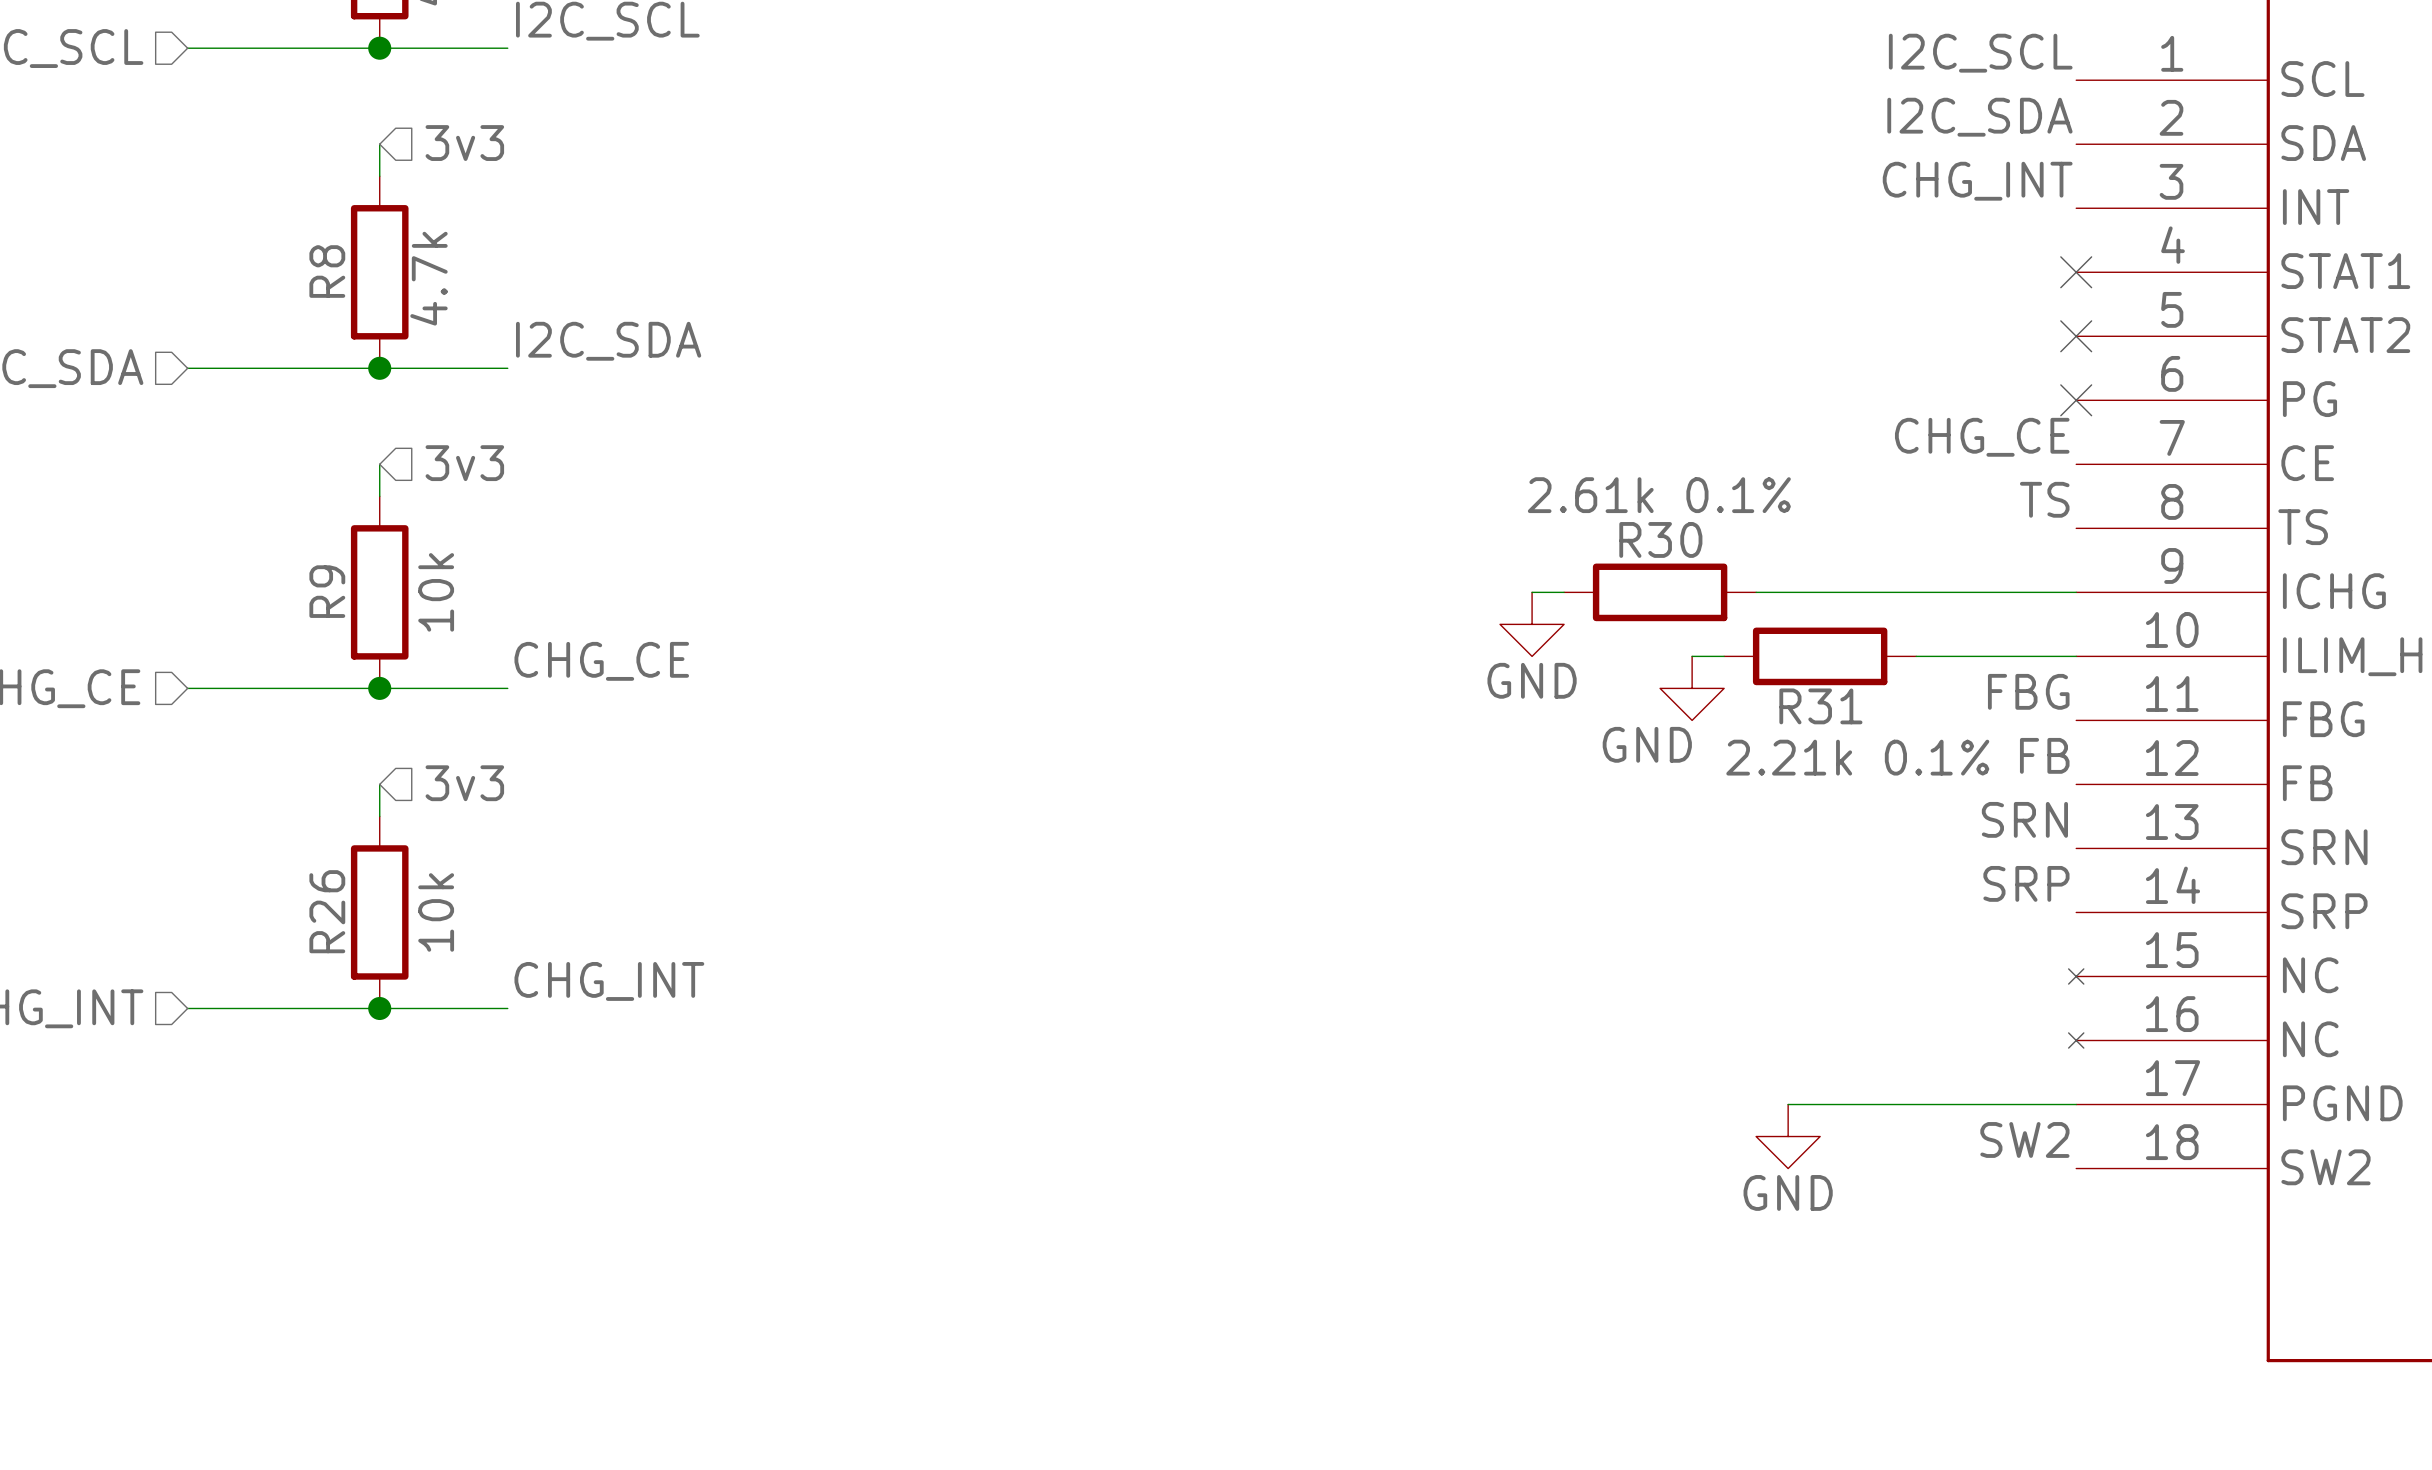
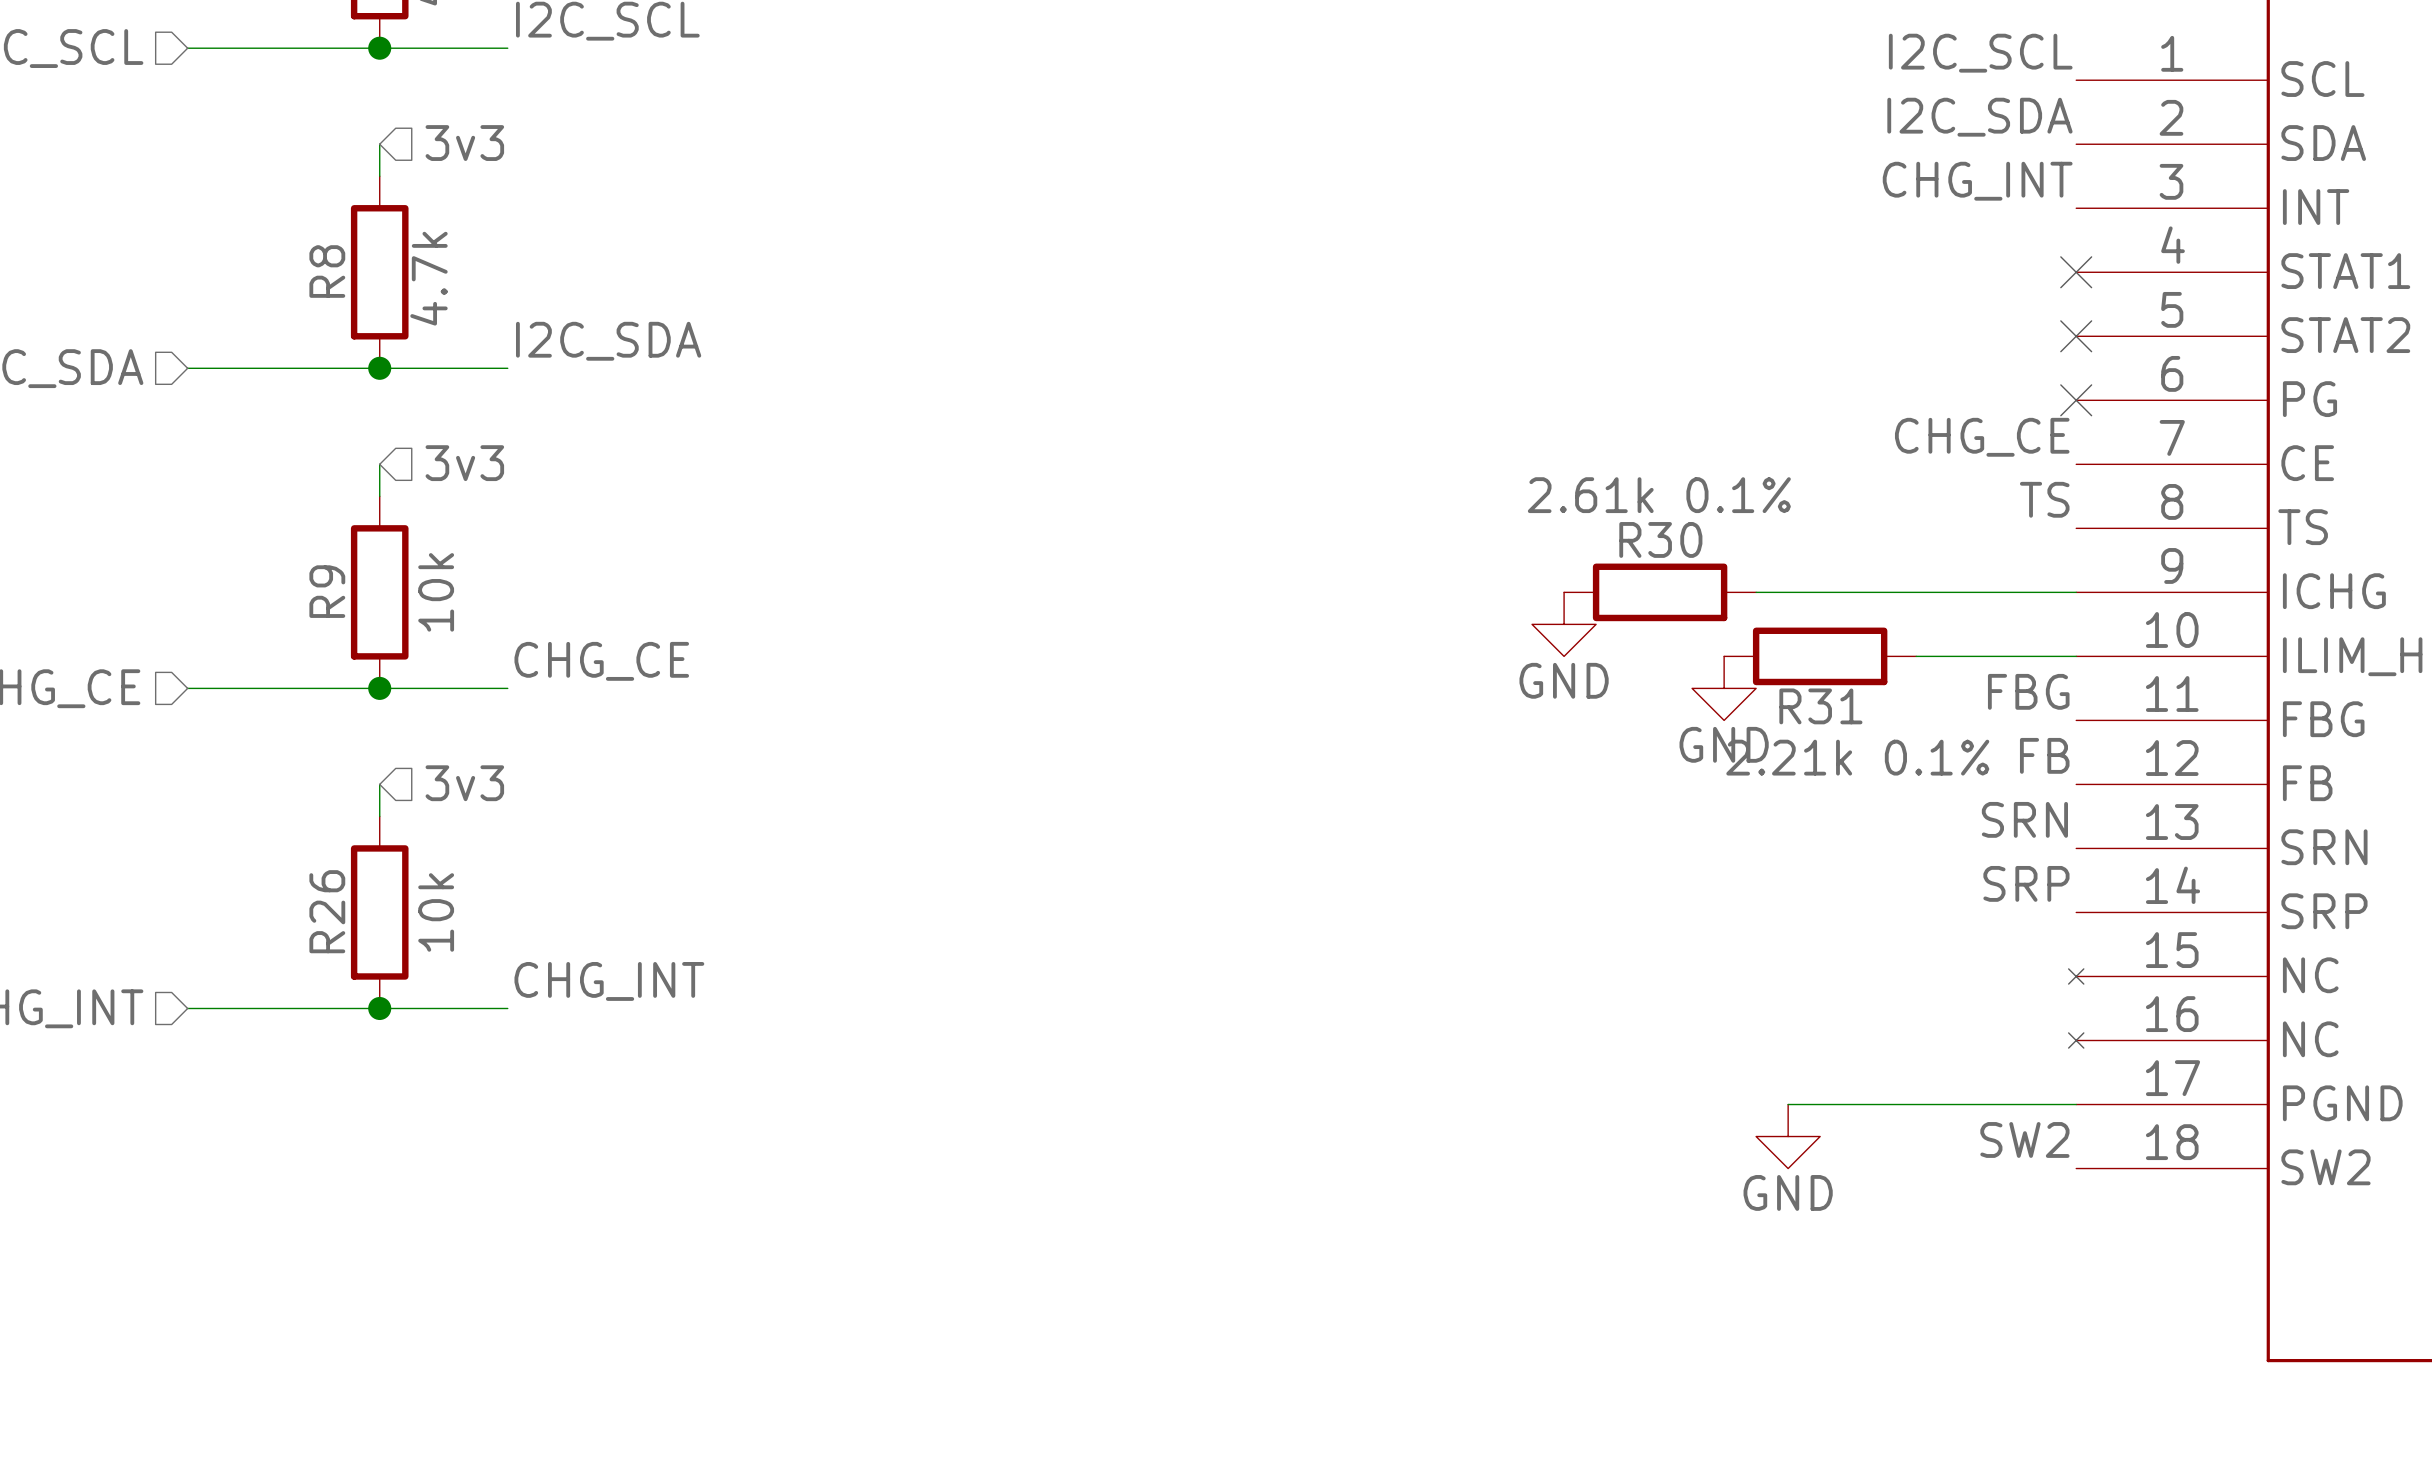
wire: (1532, 592) (1564, 592) -> none
power symbol position: GND (1532, 624) -> GND (1564, 624)
wire: (1692, 656) (1724, 656) -> none
power symbol position: GND (1692, 688) -> GND (1724, 688)
power symbol text position: GND (1647, 744) -> GND (1724, 744)

